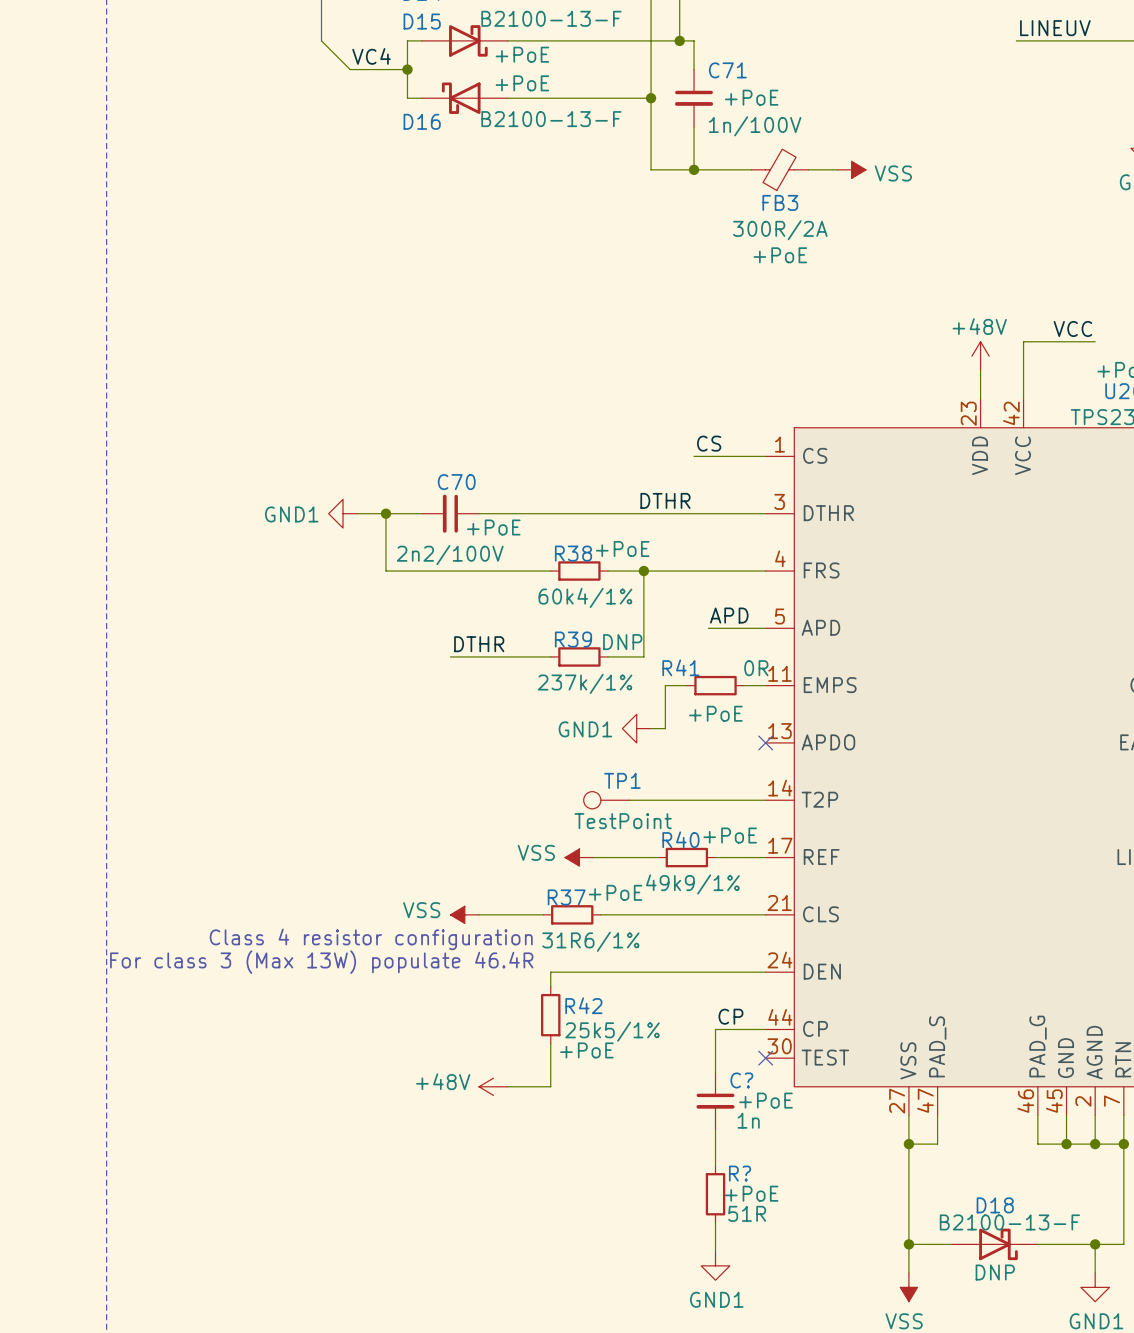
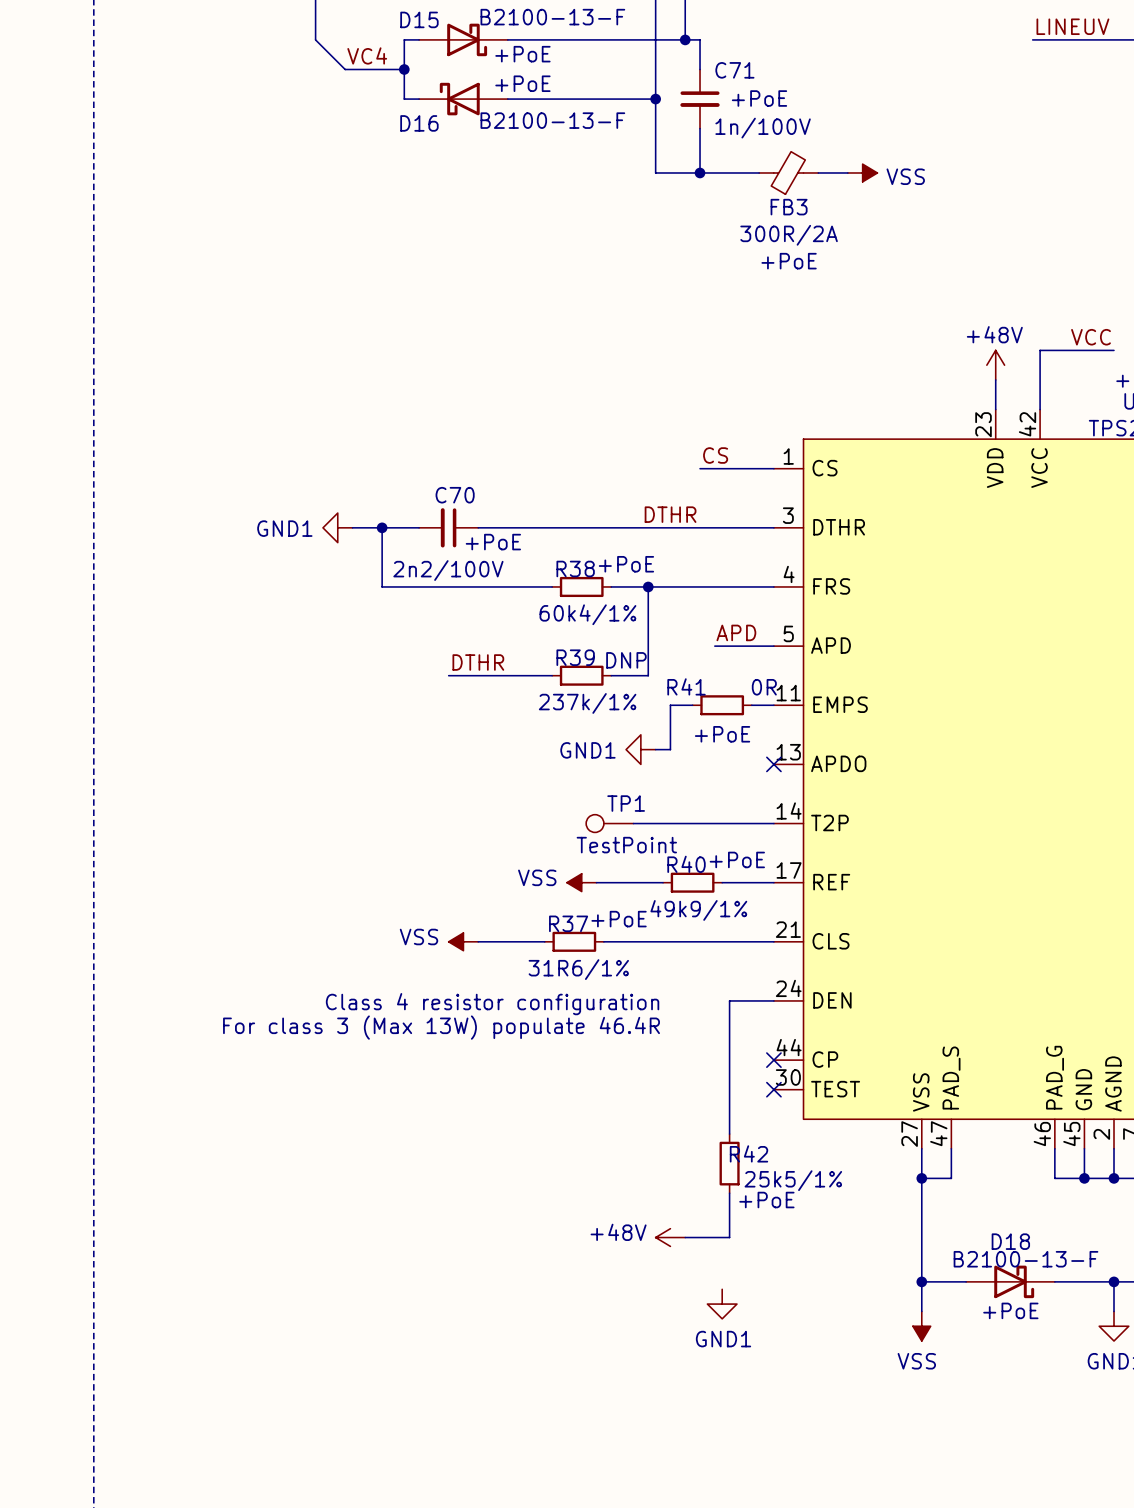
text position: Class 4 resistor configuration (371, 939) -> Class 4 resistor configuration (492, 1004)
R37 value position: 31R6/1% (590, 941) -> 31R6/1% (578, 969)
text position: For class 3 (Max 13W) populate 46.4R (321, 962) -> For class 3 (Max 13W) populate 46.4R (441, 1027)
wire: (722, 972) (550, 972) (550, 986) -> (729, 1000) (729, 1134)
R42 name position: R42 (583, 1005) -> R42 (748, 1153)
R42 position: (550, 1015) -> (729, 1163)
label: CP (730, 1016) -> none
wire: (765, 1029) (715, 1029) (715, 1072) -> none
no-connect mark: none -> (773, 1060)
wire: (550, 1043) (550, 1086) (507, 1086) -> (729, 1193) (729, 1237) (685, 1237)
power symbol position: +48V (493, 1086) -> +48V (670, 1237)
C?: 1n (715, 1101) -> none
wire: (715, 1129) (715, 1165) -> none
R?: 51R (715, 1194) -> none
wire: (715, 1222) (715, 1251) -> none
D18 text: DNP (995, 1272) -> +PoE (1010, 1310)

